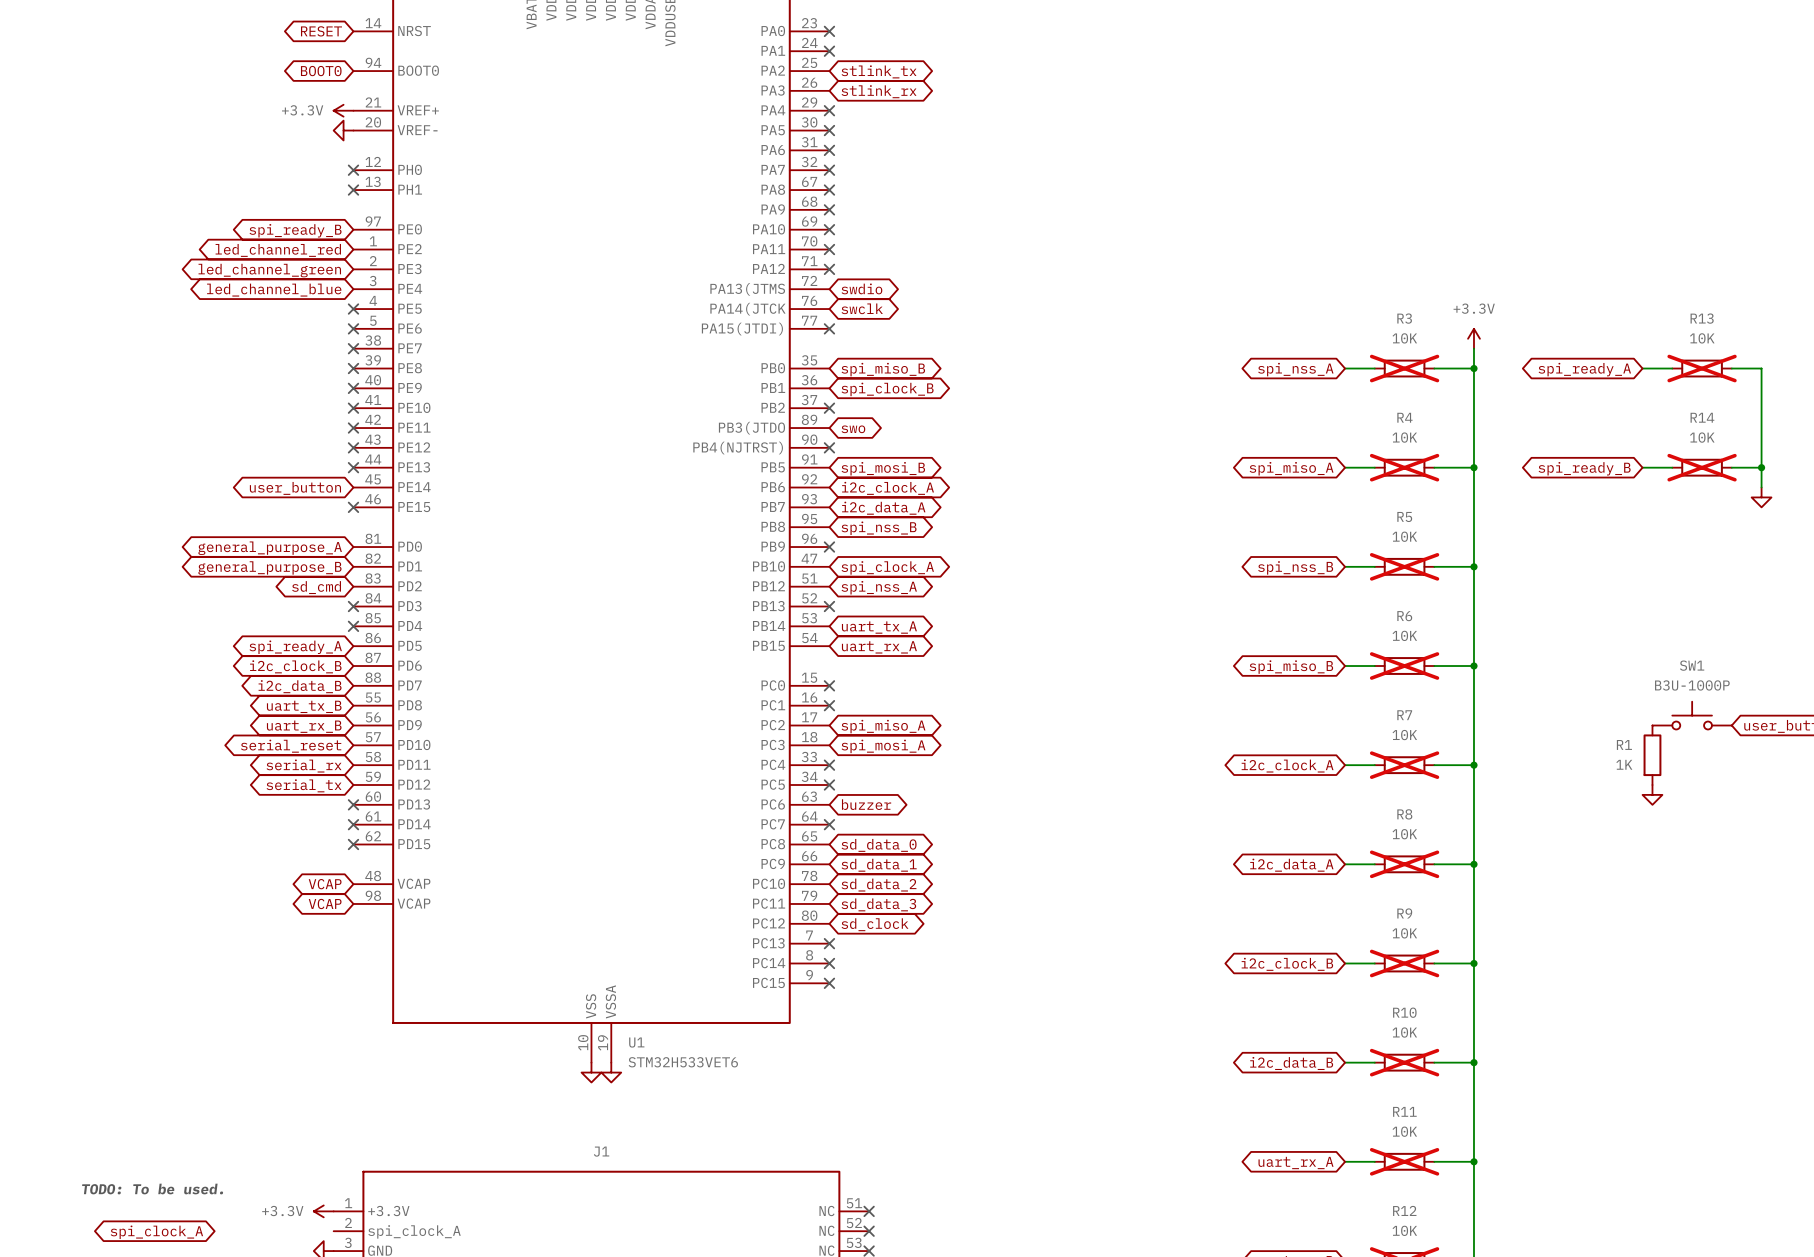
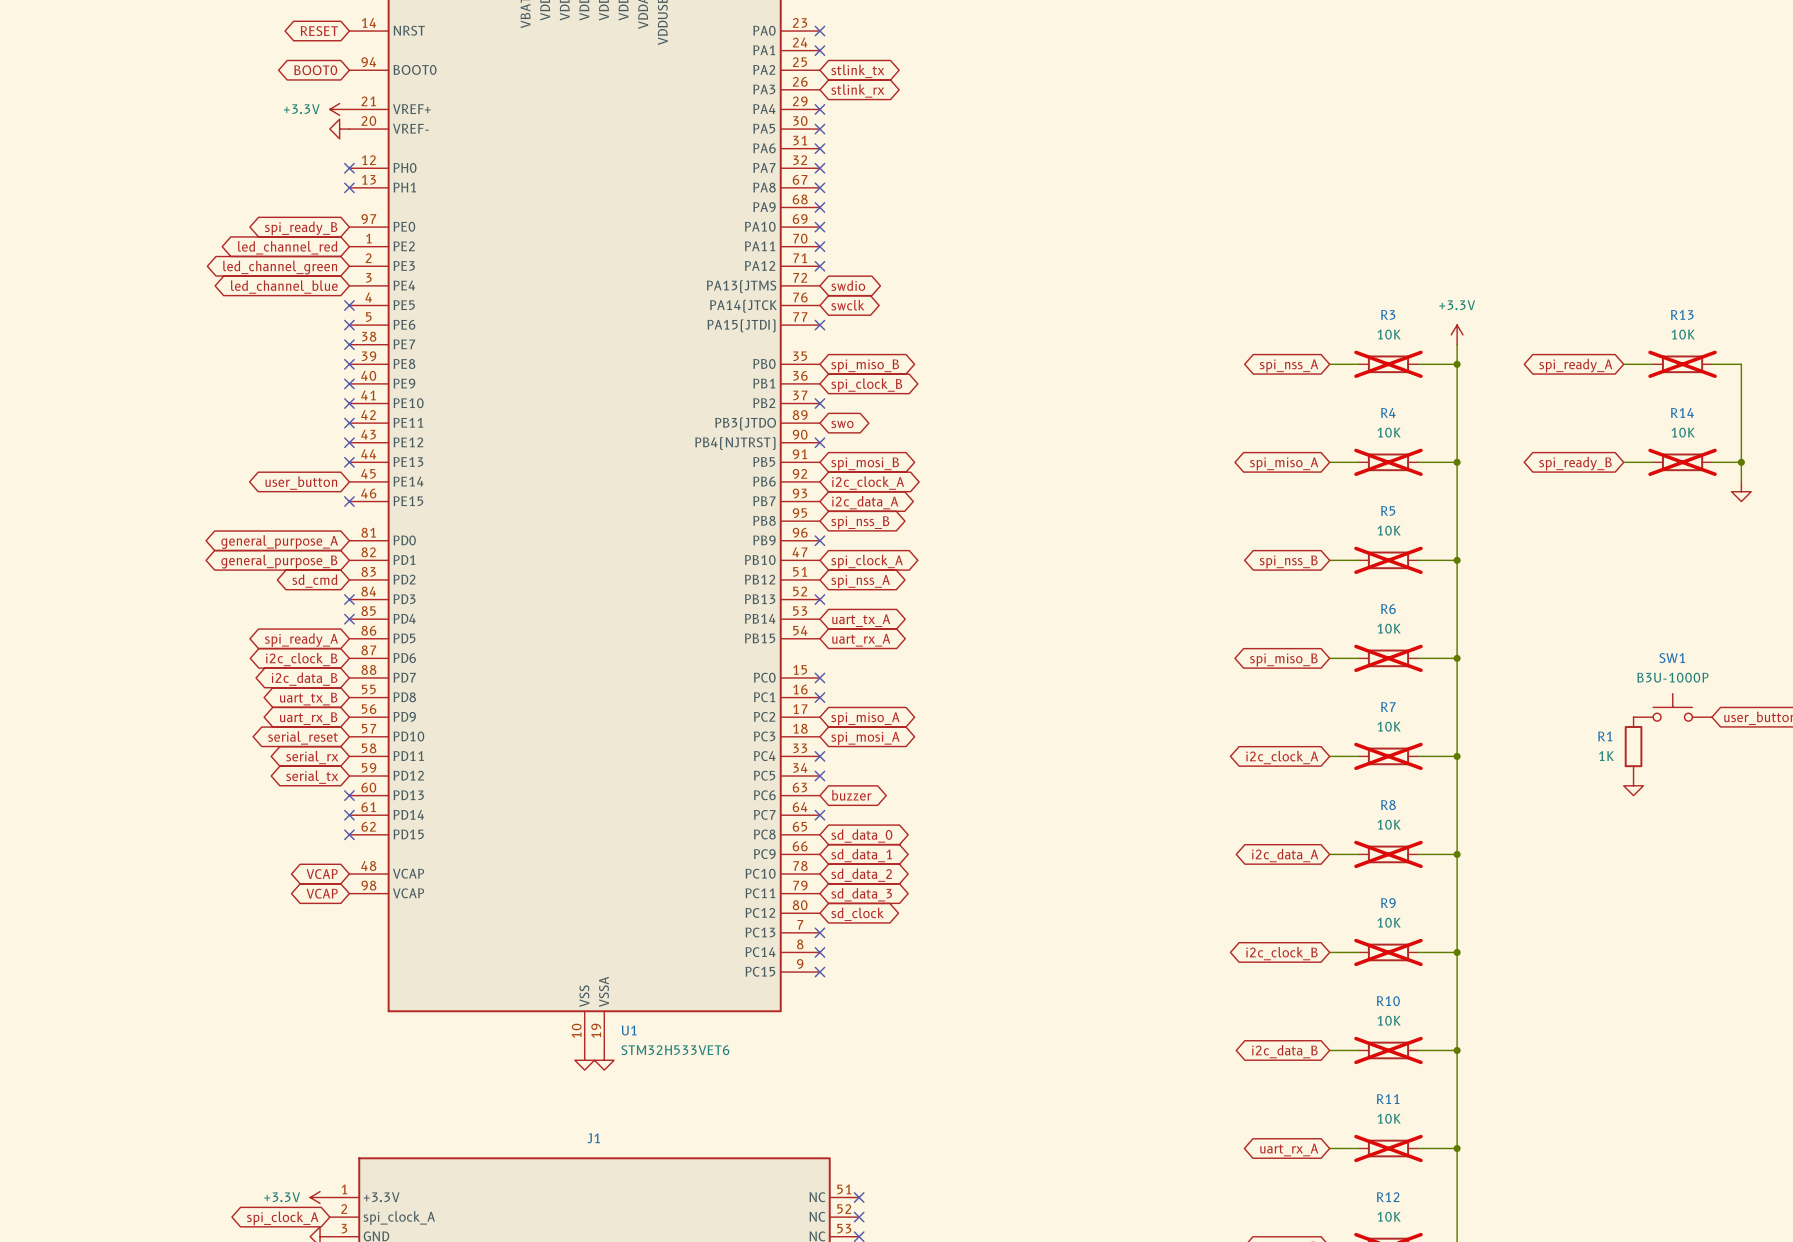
text: TODO: To be used. (152, 1189) -> none
global label position: spi_clock_A (156, 1232) -> spi_clock_A (282, 1218)

